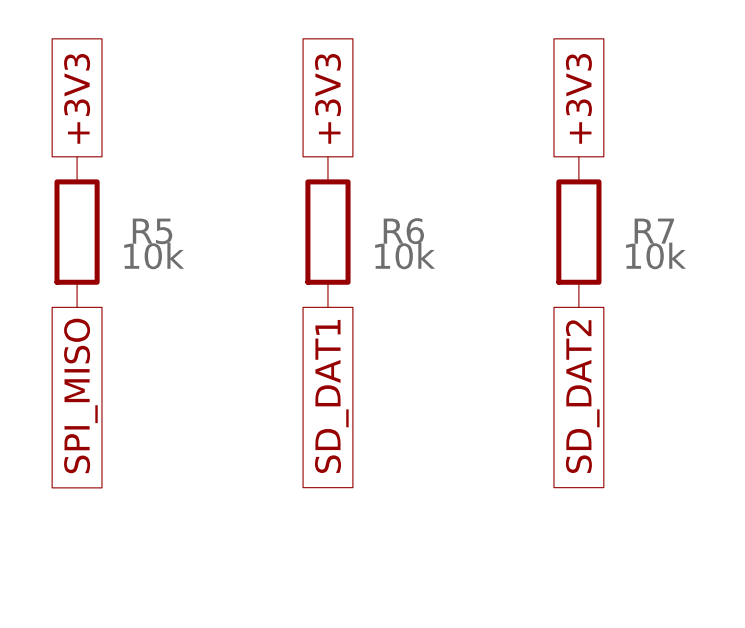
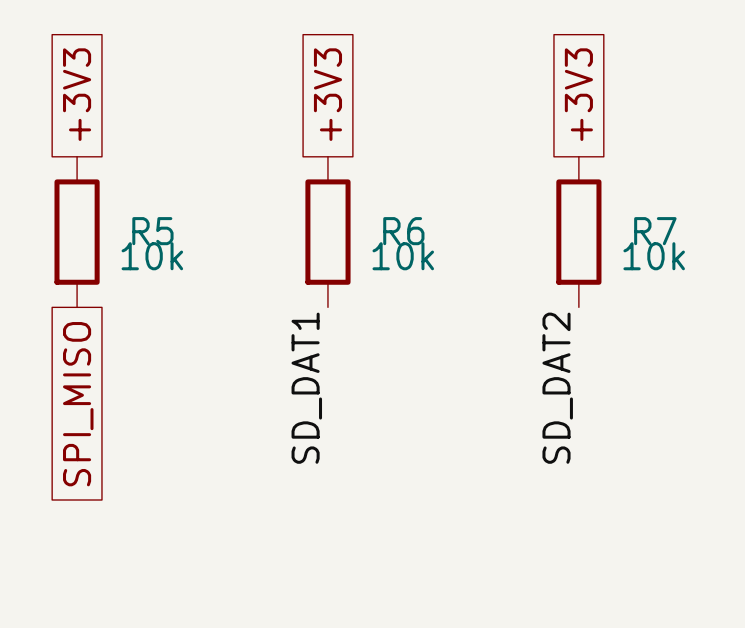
label: none -> SD_DAT1 (306, 388)
label: none -> SD_DAT2 (557, 388)
global label: SD_DAT1 (331, 396) -> none
global label: SD_DAT2 (582, 396) -> none

